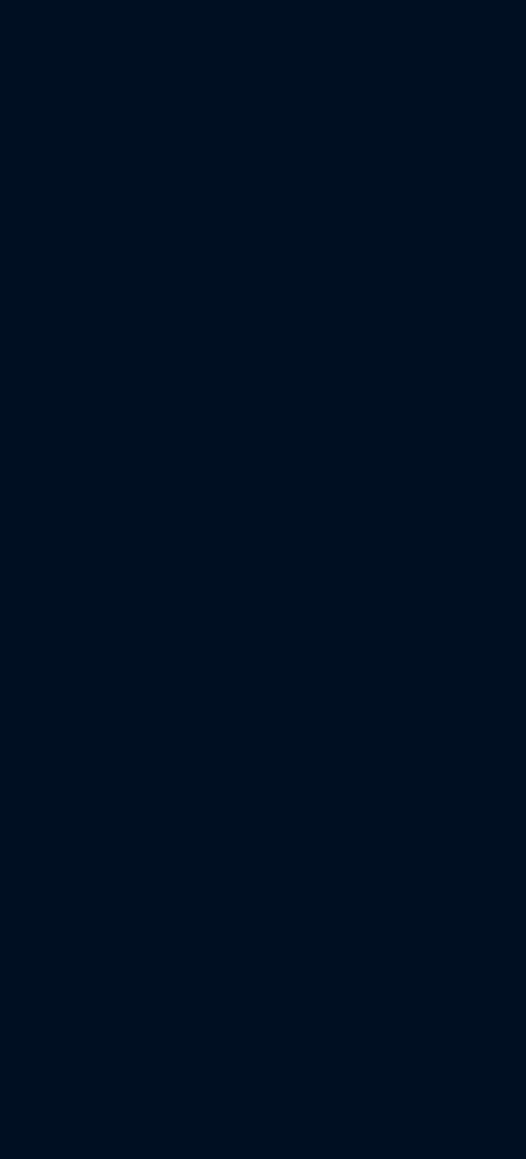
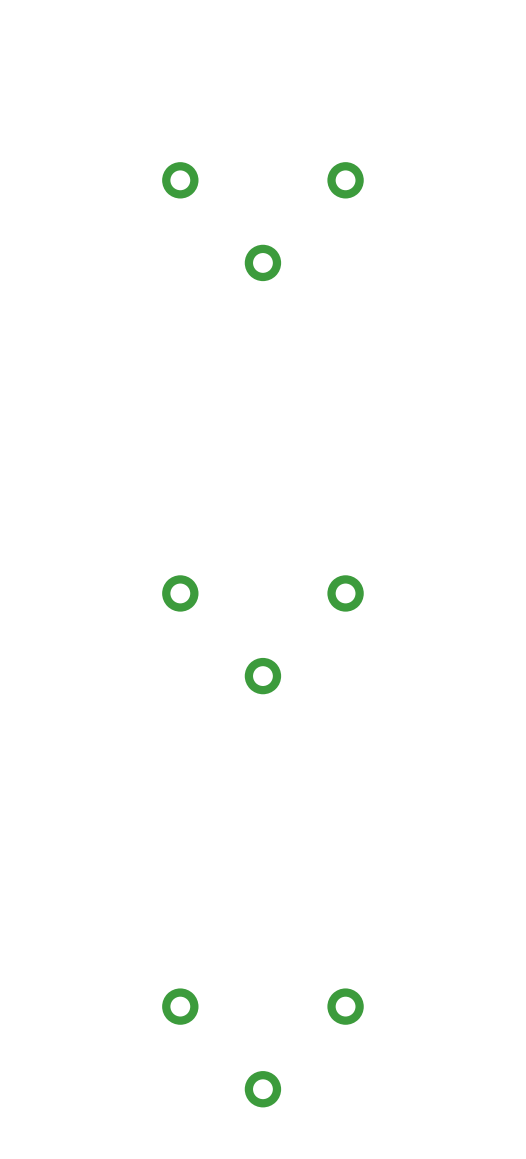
part: none -> (262, 221)
part: none -> (262, 634)
part: none -> (262, 1047)

